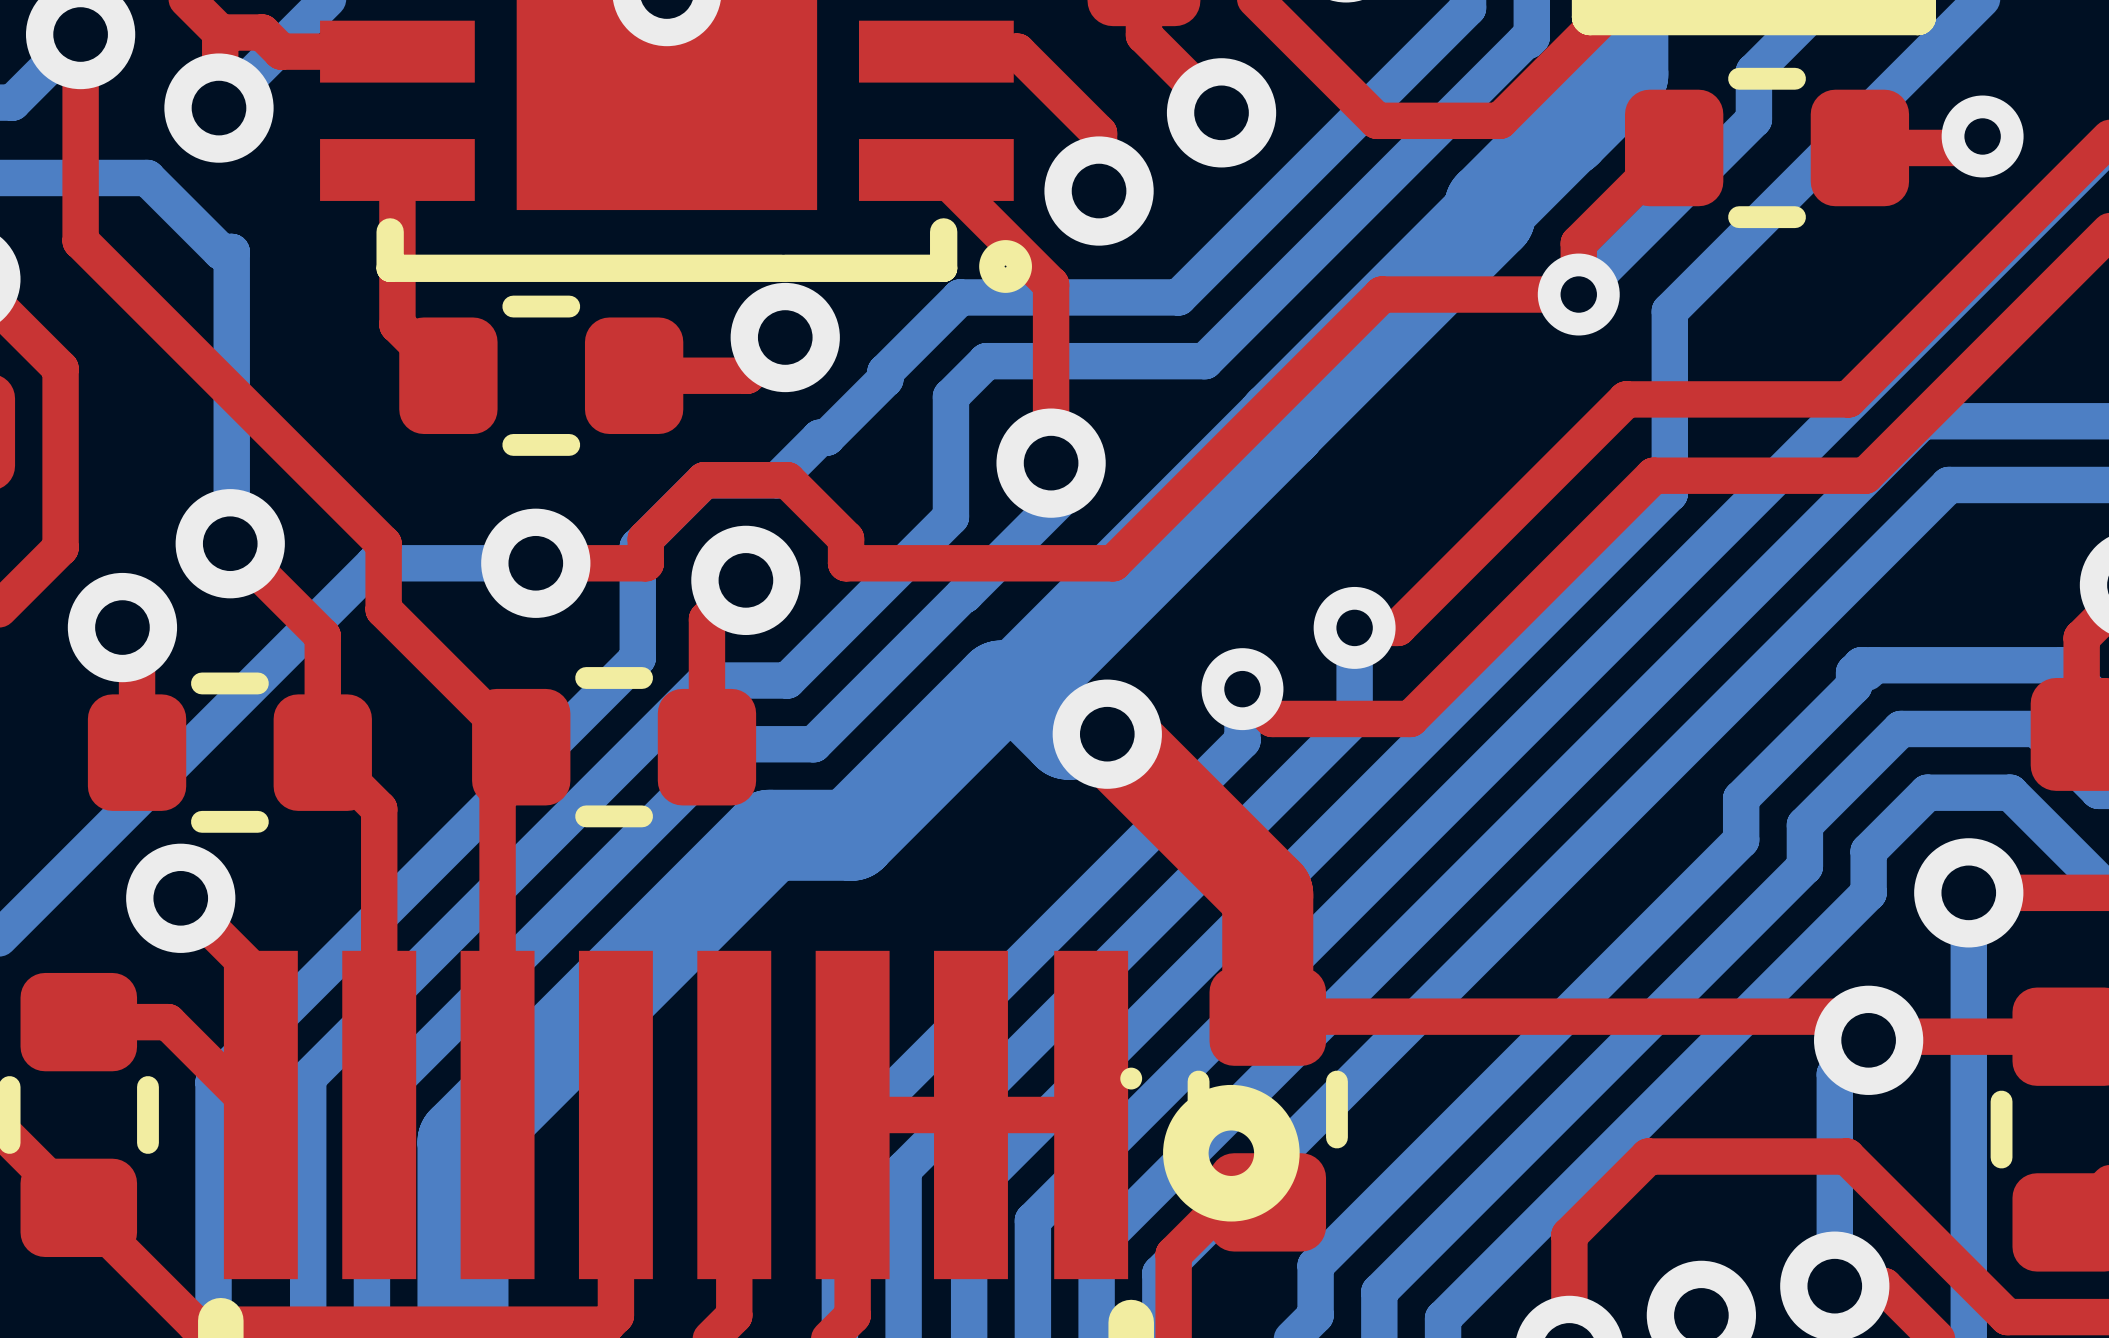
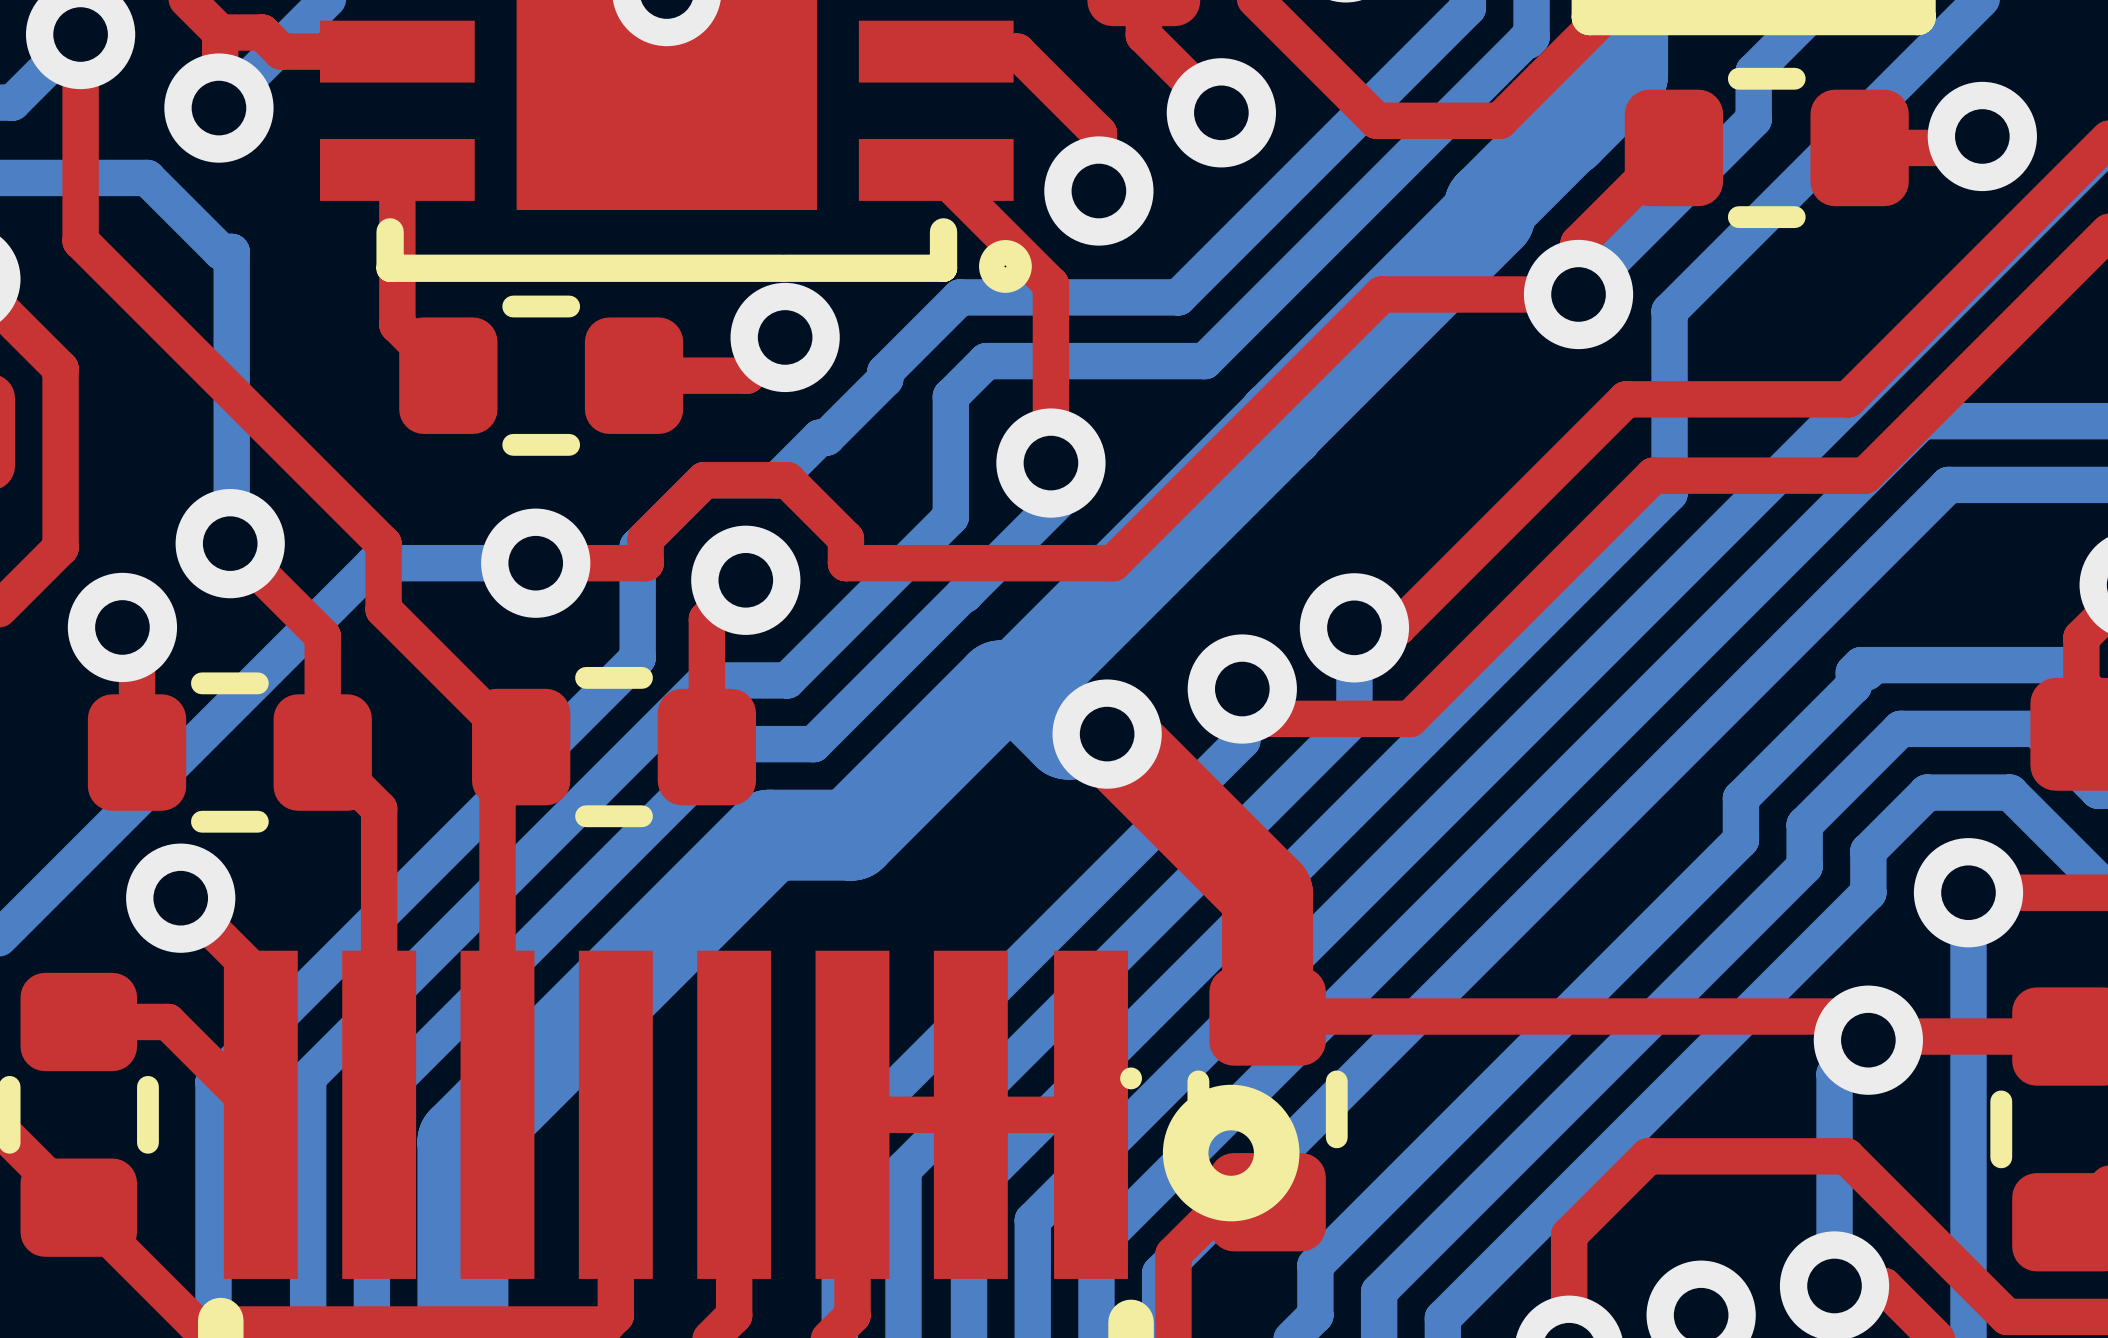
via size: [1941, 95, 2024, 178] -> [1927, 81, 2037, 192]
via size: [1537, 253, 1620, 336] -> [1523, 239, 1634, 350]
via size: [1313, 586, 1396, 669] -> [1299, 573, 1410, 683]
via size: [1201, 648, 1284, 731] -> [1187, 634, 1297, 744]

